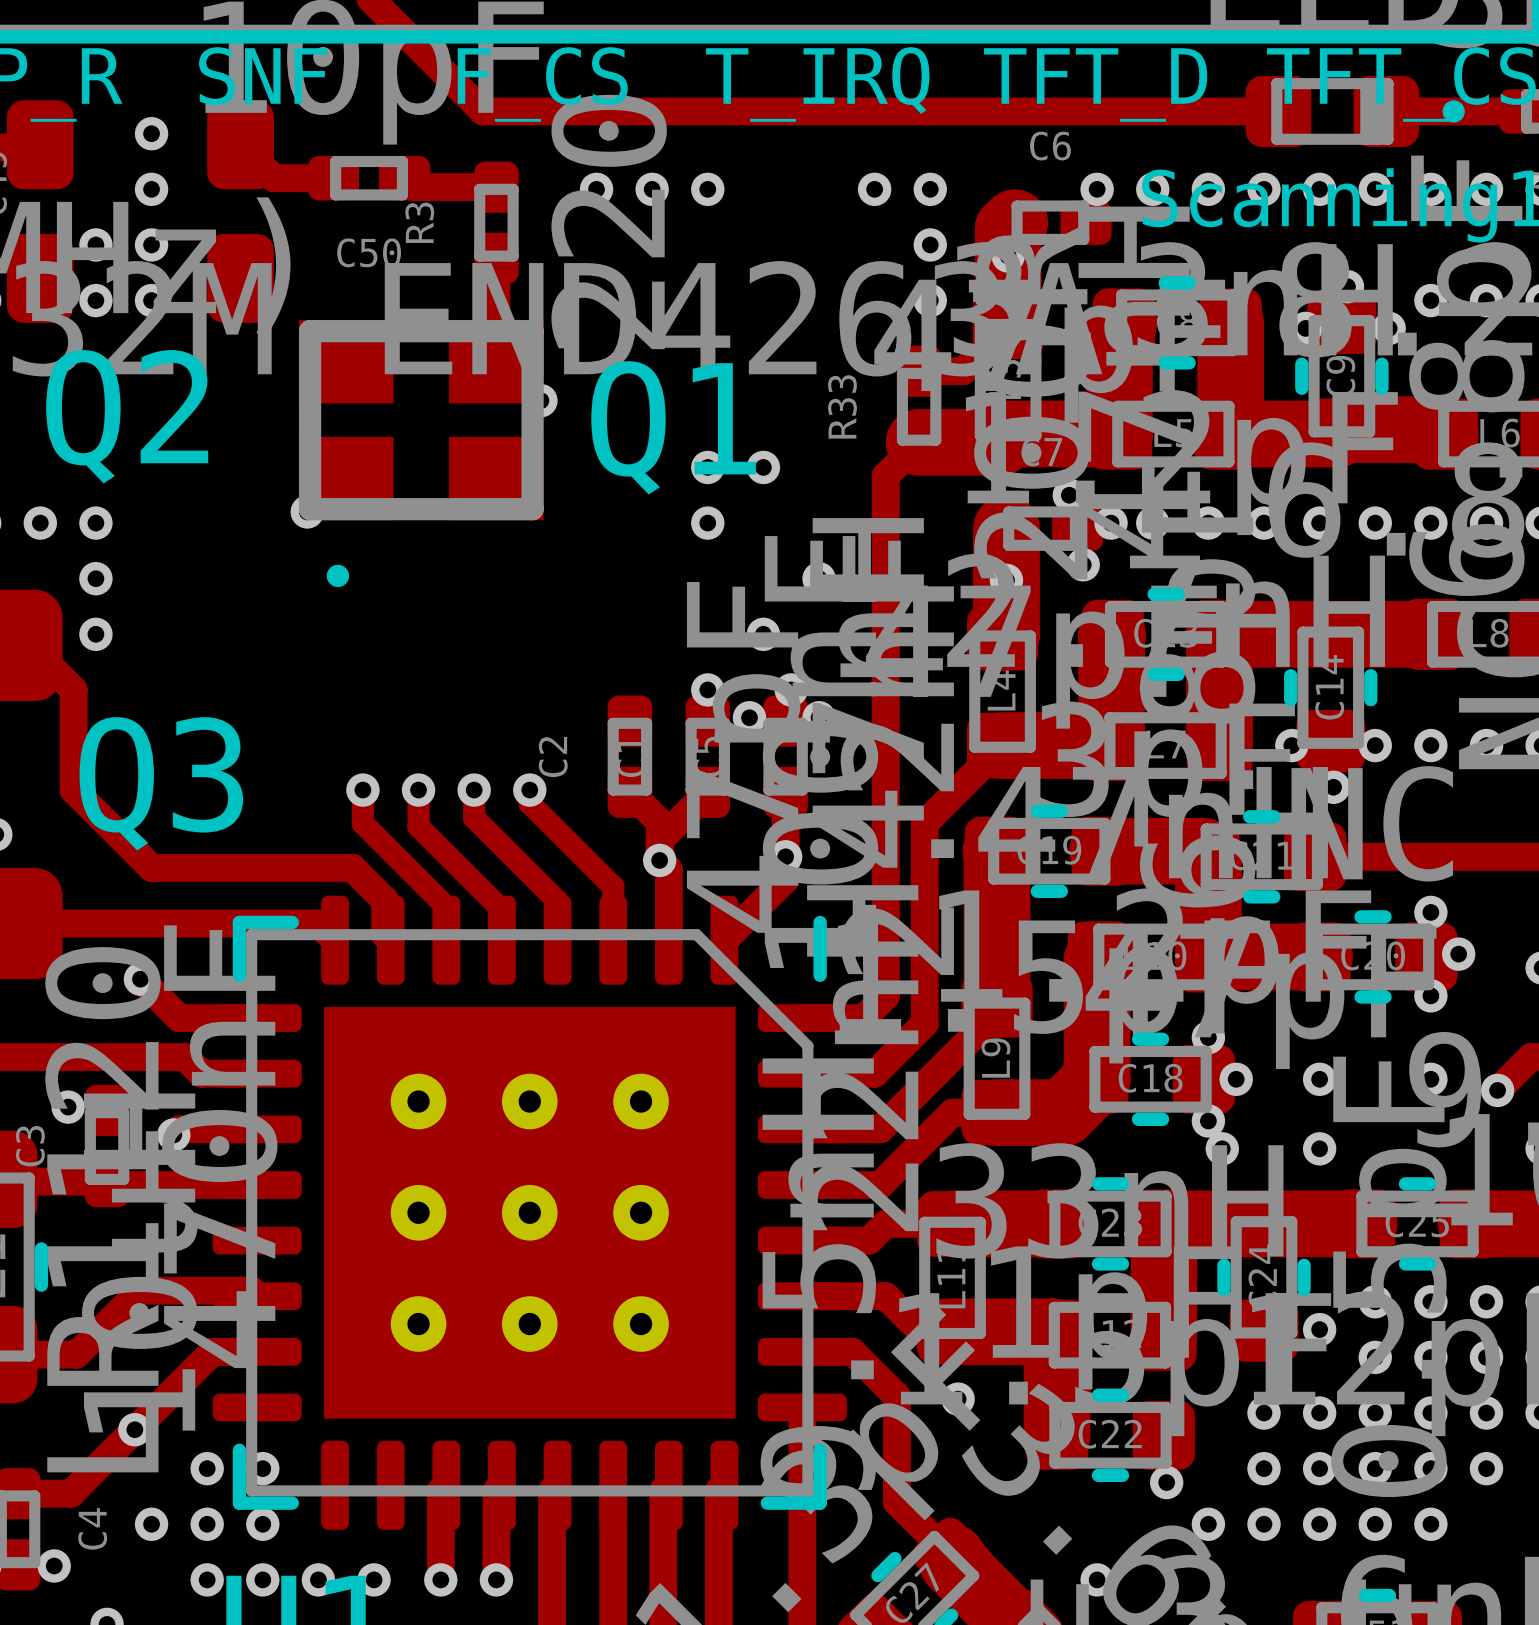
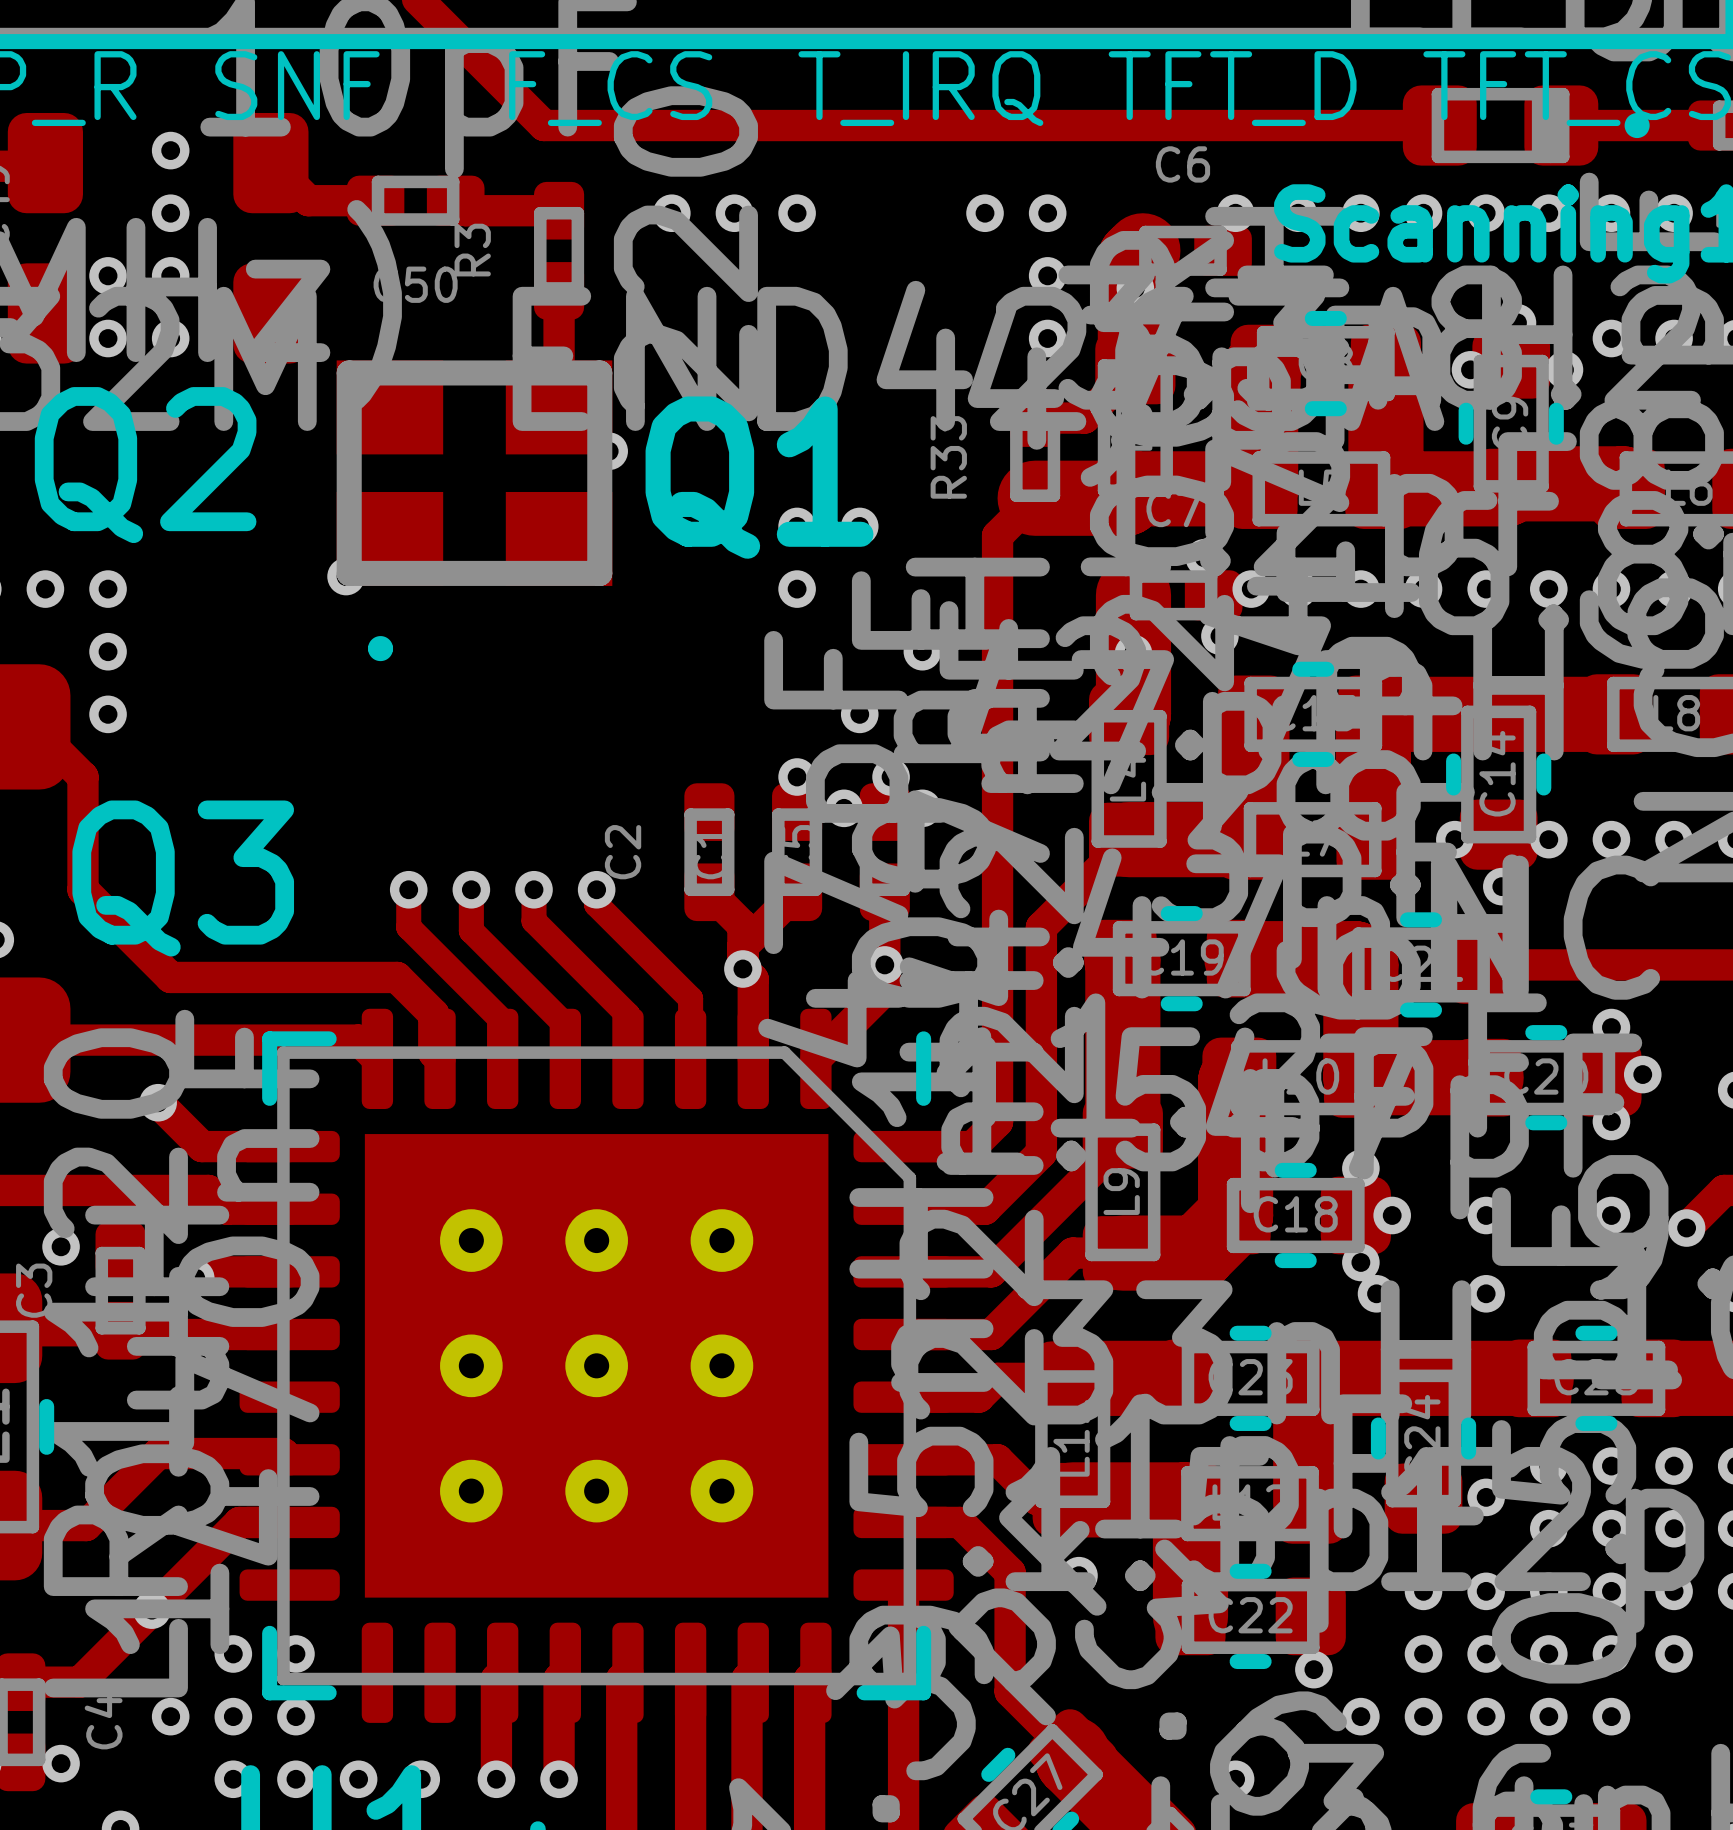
via position: (68, 1107) -> (61, 1246)

